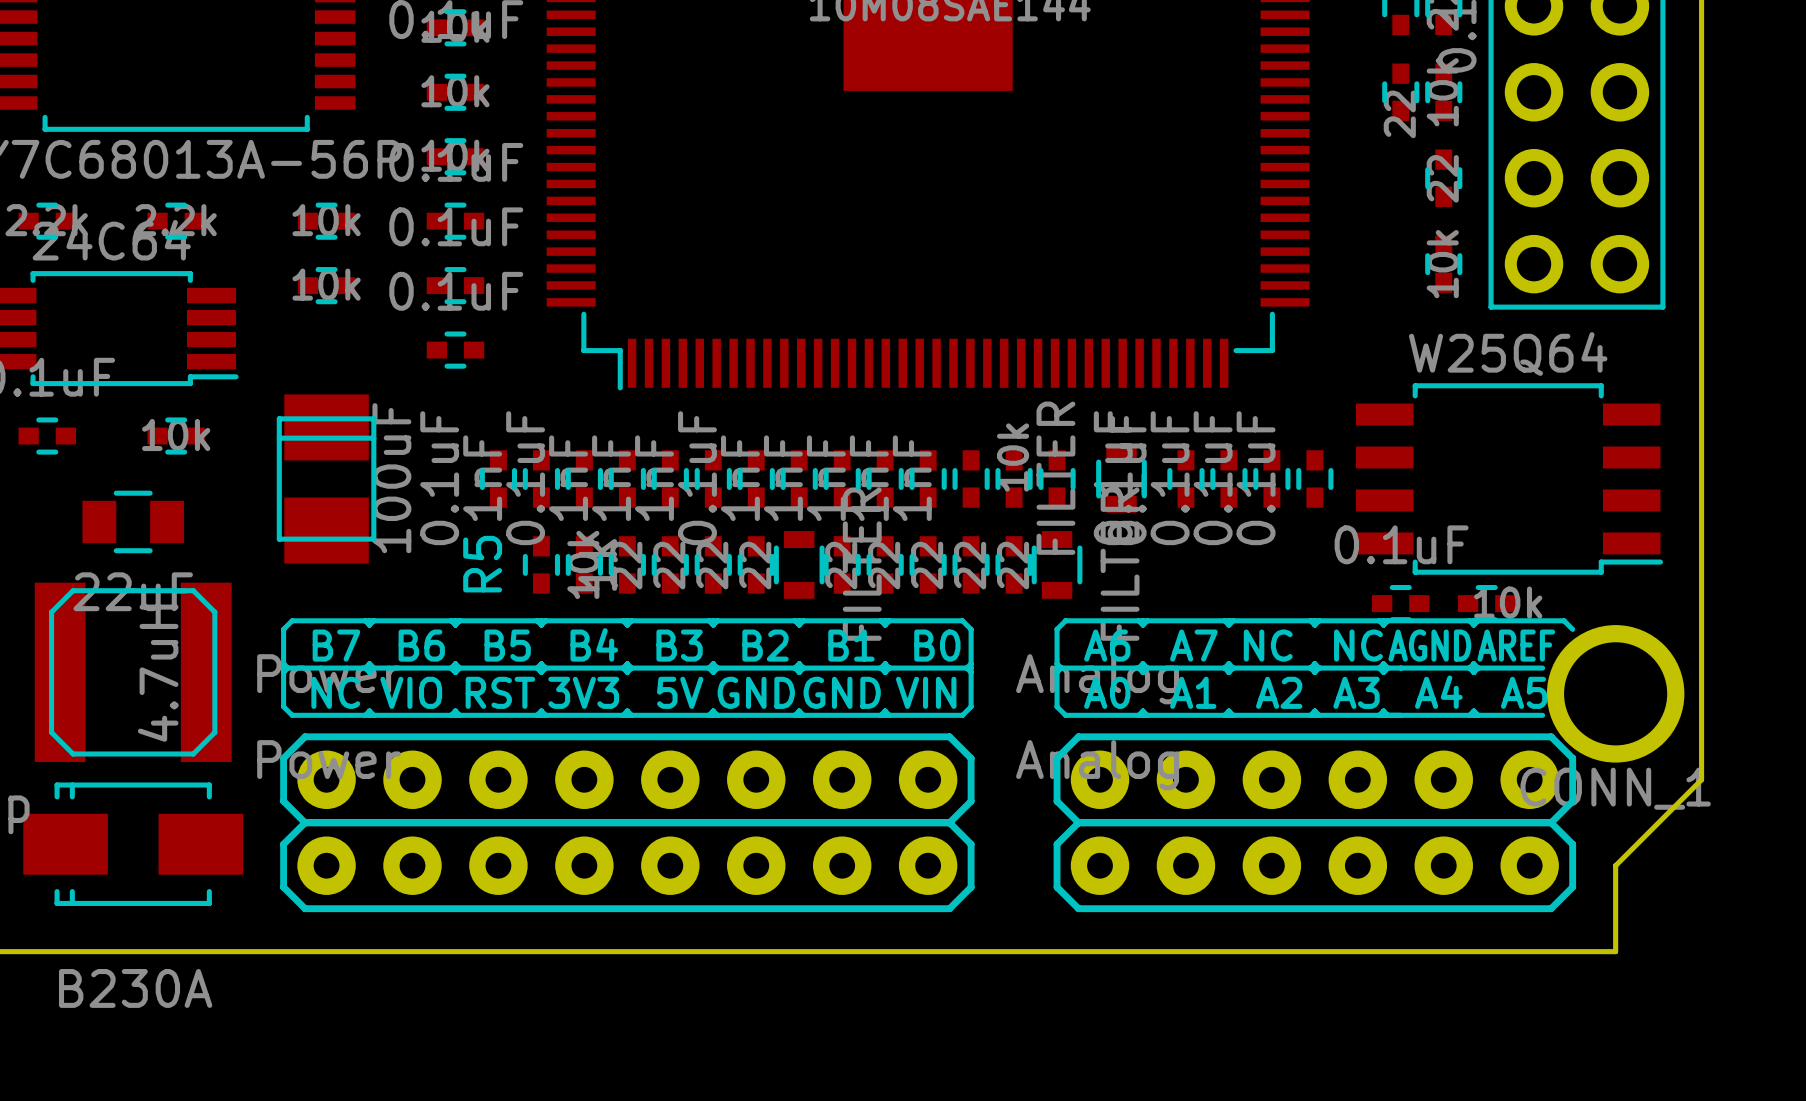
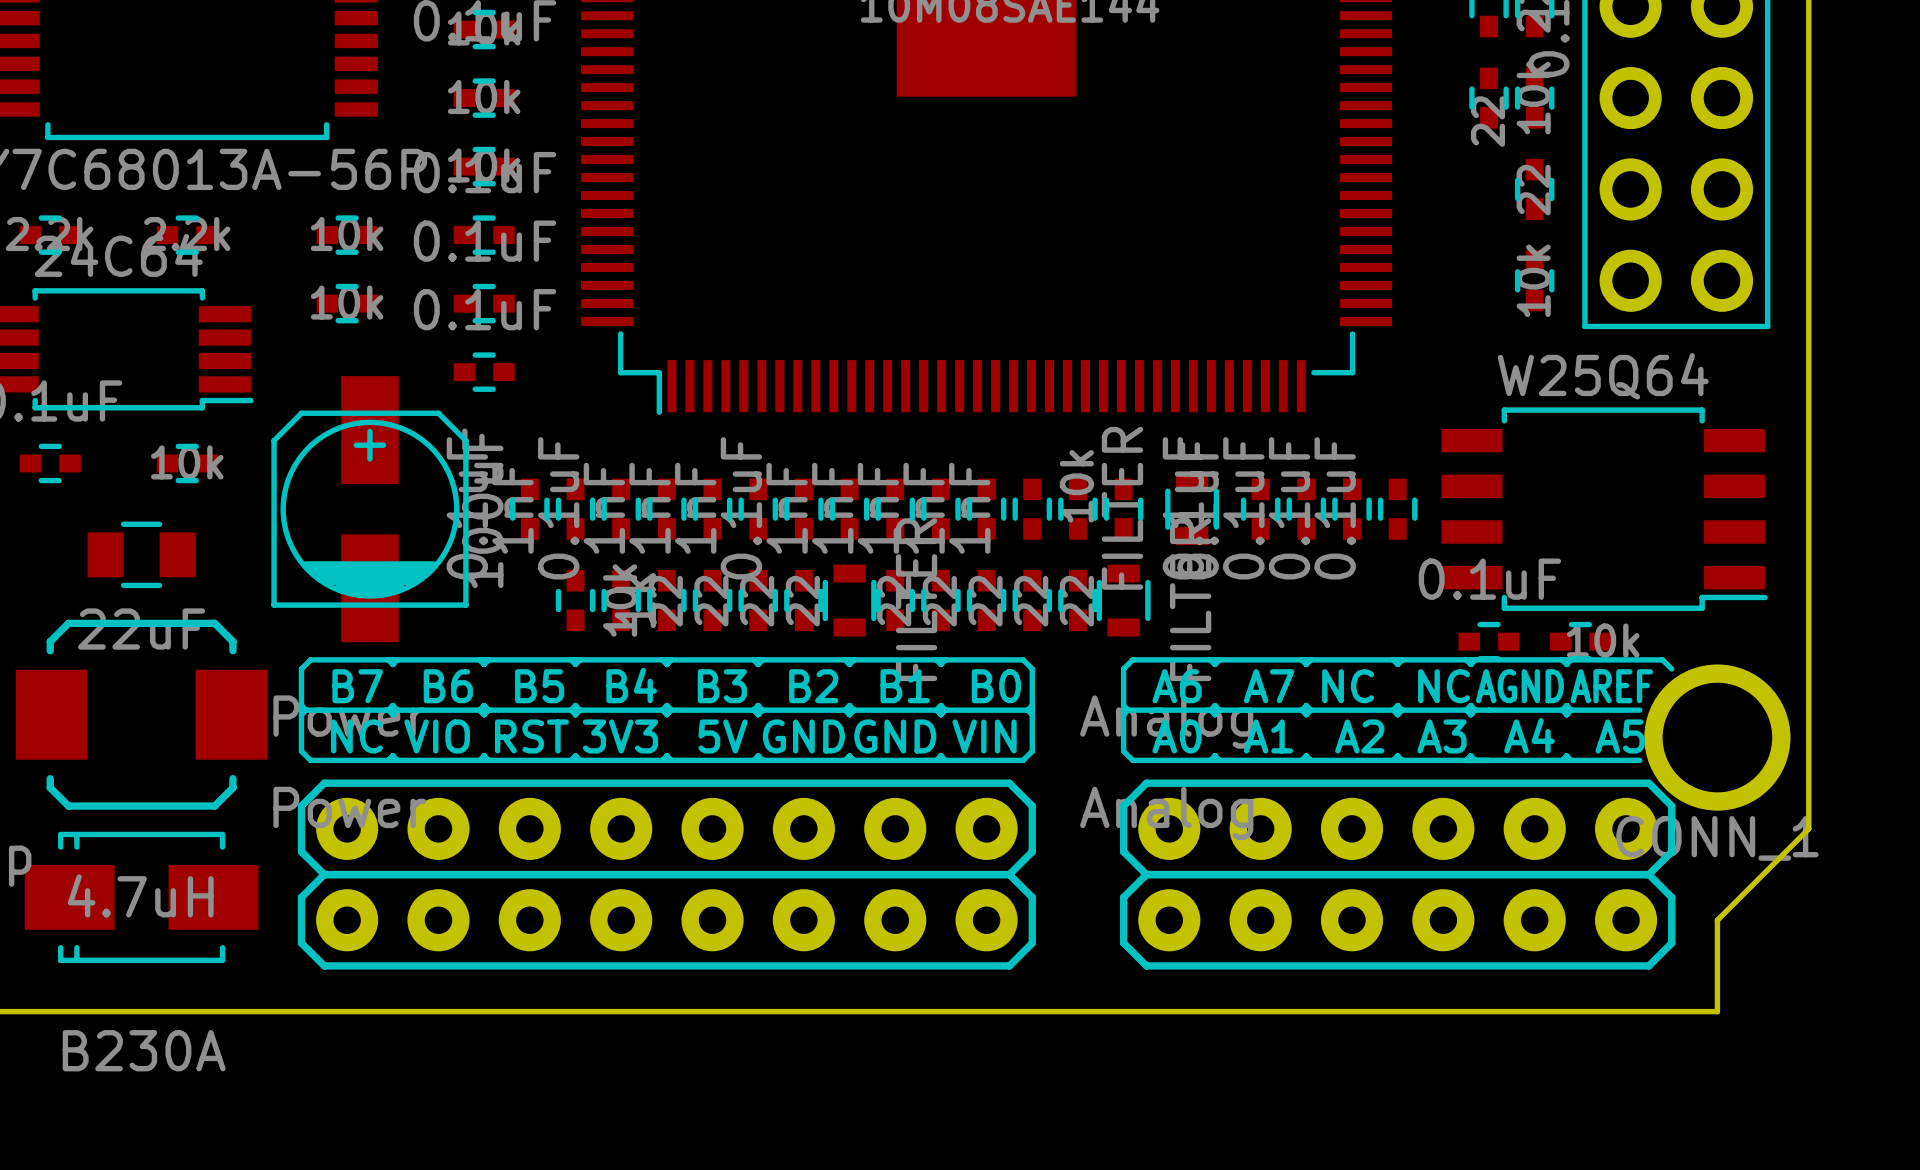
part footprint: [276, 394, 377, 564] -> [271, 376, 469, 643]
R5 name: R5 (482, 564) -> none
part footprint: [34, 582, 232, 763] -> [15, 619, 268, 810]
part value position: 4.7uH (158, 673) -> 4.7uH (140, 895)

